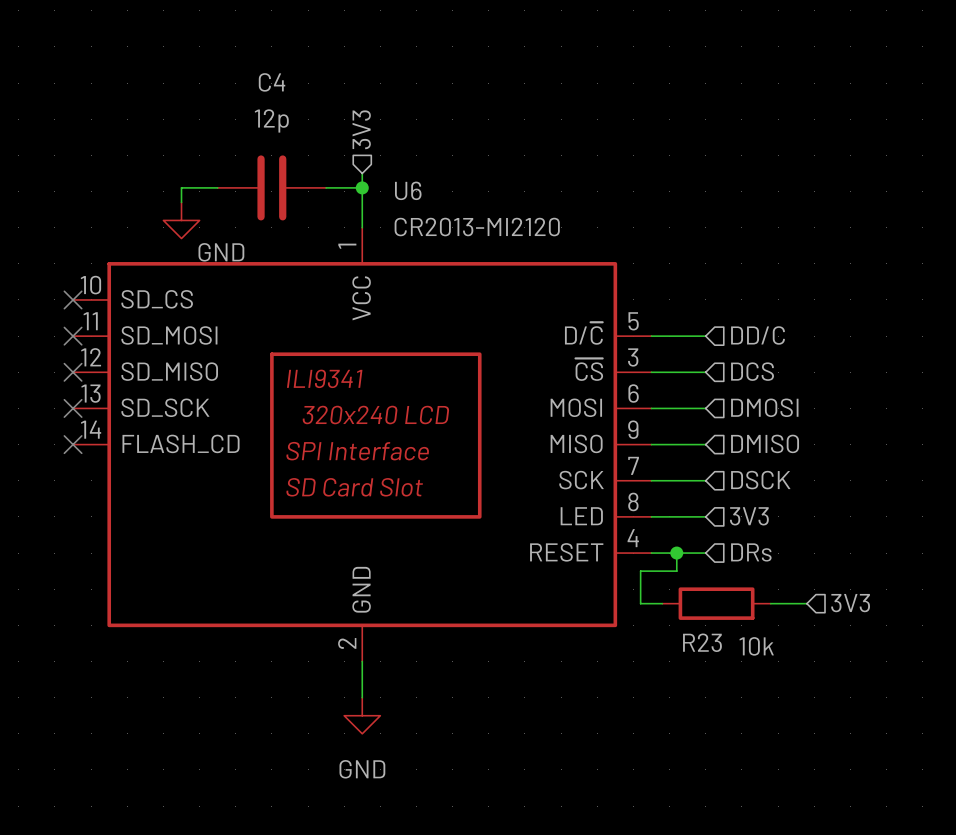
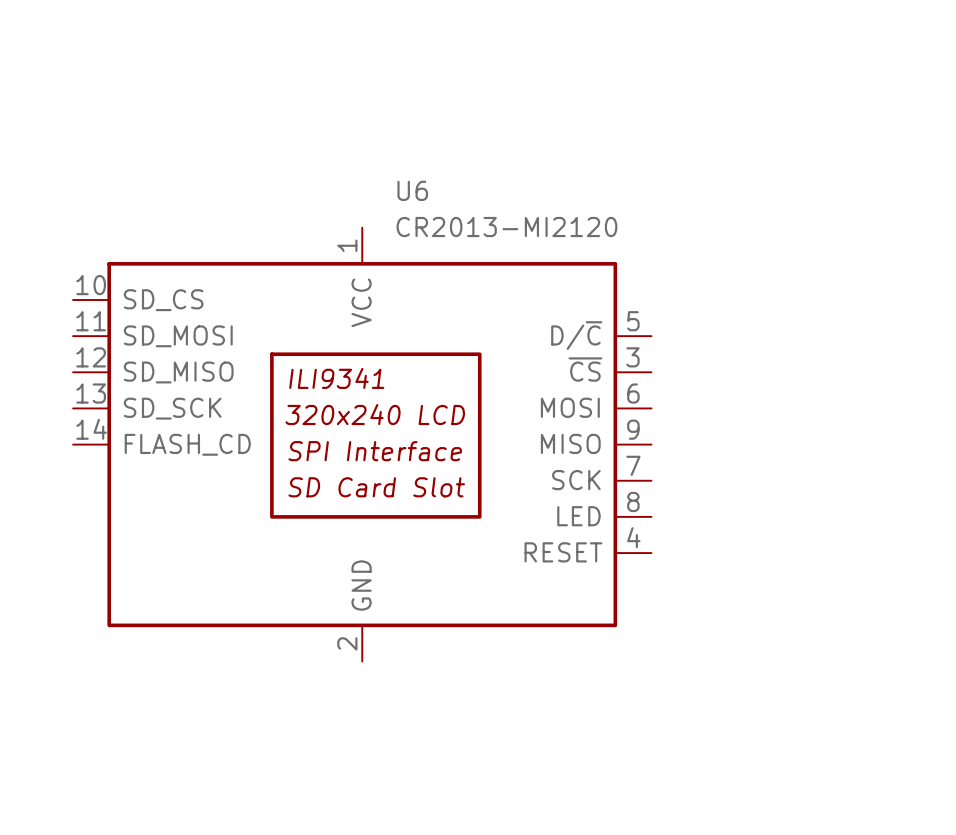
hierarchical label: 3V3 (361, 129) -> none
wire: (362, 173) (362, 227) -> none
wire: (217, 187) (181, 187) (181, 202) -> none
C4: 12p (271, 187) -> none
wire: (326, 187) (362, 187) -> none
junction: (362, 187) -> none
power symbol: GND (181, 220) -> none
no-connect mark: (73, 299) -> none
hierarchical label: DD/C (758, 335) -> none
no-connect mark: (73, 336) -> none
wire: (651, 336) (705, 336) -> none
hierarchical label: DCS (752, 371) -> none
no-connect mark: (73, 372) -> none
wire: (651, 372) (705, 372) -> none
hierarchical label: DMOSI (764, 407) -> none
no-connect mark: (73, 408) -> none
wire: (651, 408) (705, 408) -> none
hierarchical label: DMISO (765, 443) -> none
no-connect mark: (73, 444) -> none
wire: (651, 444) (705, 444) -> none
wire: (651, 480) (705, 480) -> none
hierarchical label: DSCK (760, 480) -> none
wire: (651, 516) (705, 516) -> none
hierarchical label: 3V3 (749, 516) -> none
hierarchical label: DRs (751, 552) -> none
wire: (651, 553) (705, 553) -> none
wire: (676, 553) (676, 571) (640, 571) (640, 603) (662, 603) -> none
junction: (676, 553) -> none
R23: 10k (716, 603) -> none
wire: (770, 603) (806, 603) -> none
hierarchical label: 3V3 (850, 603) -> none
wire: (362, 661) (362, 697) -> none
power symbol: GND (362, 715) -> none

